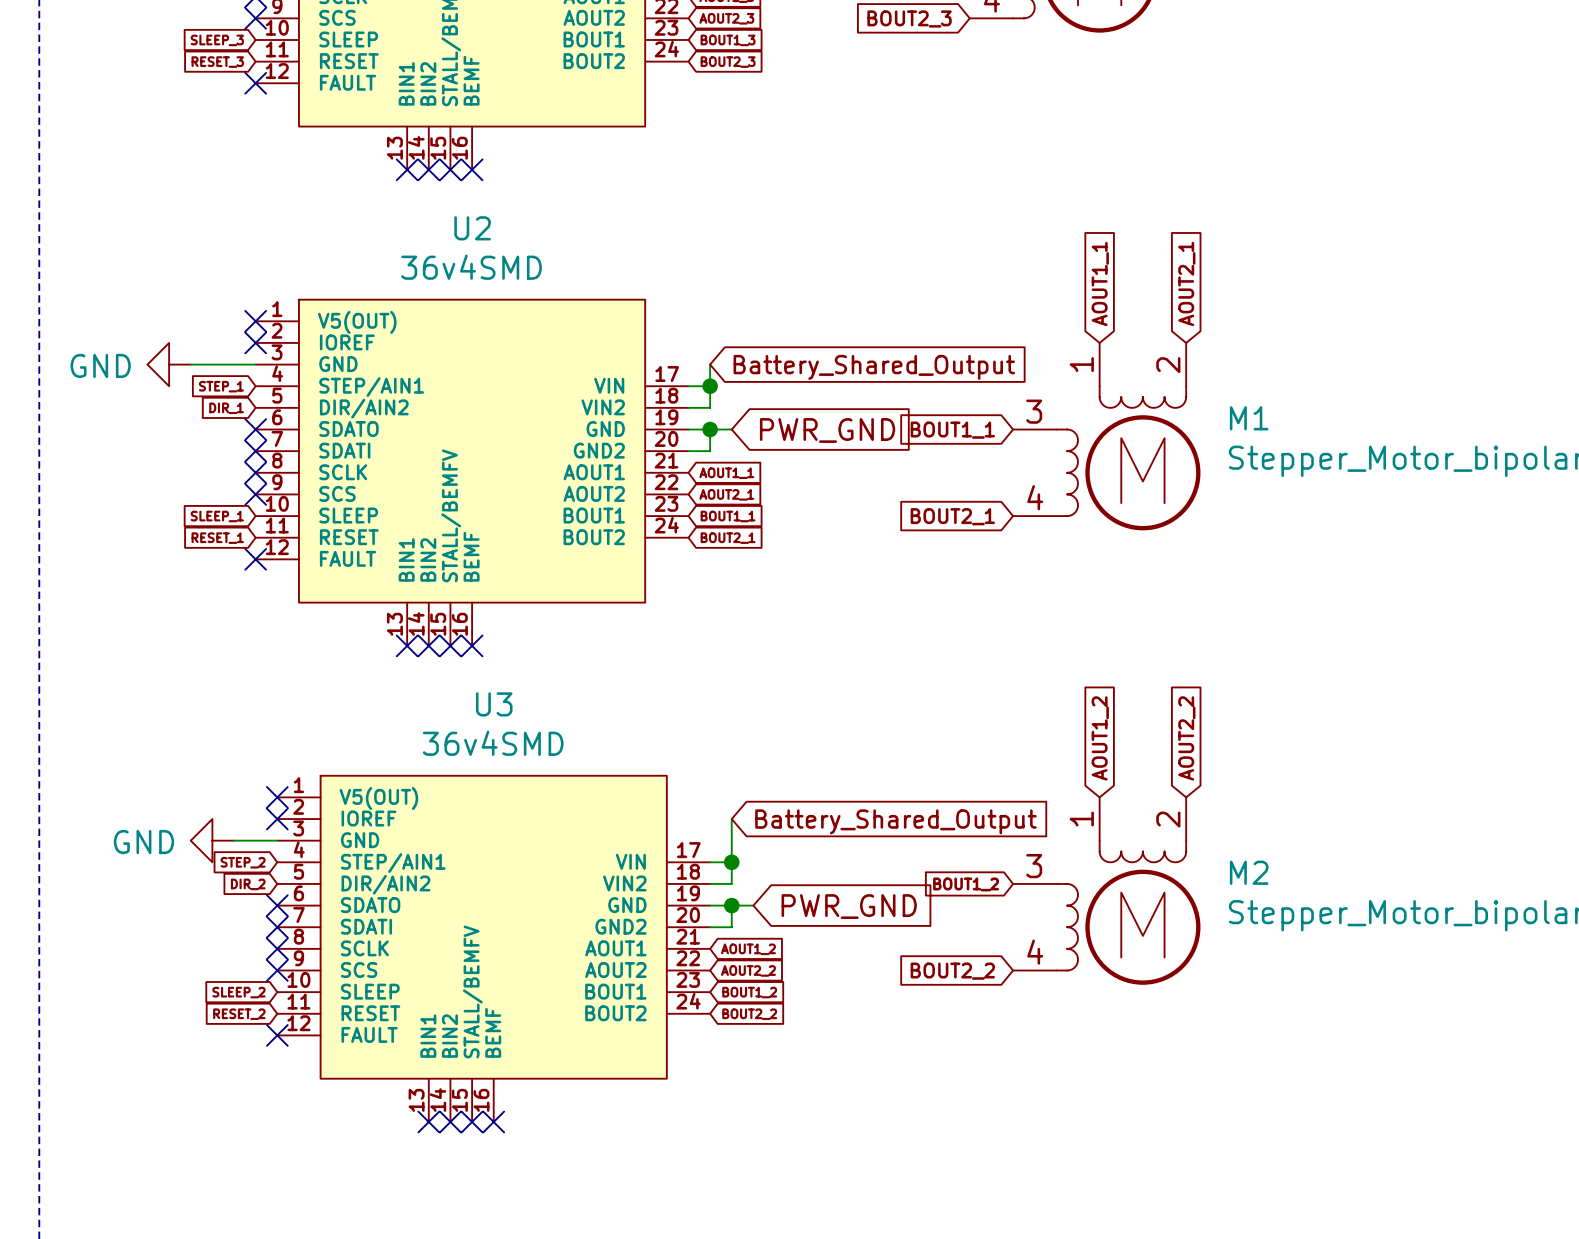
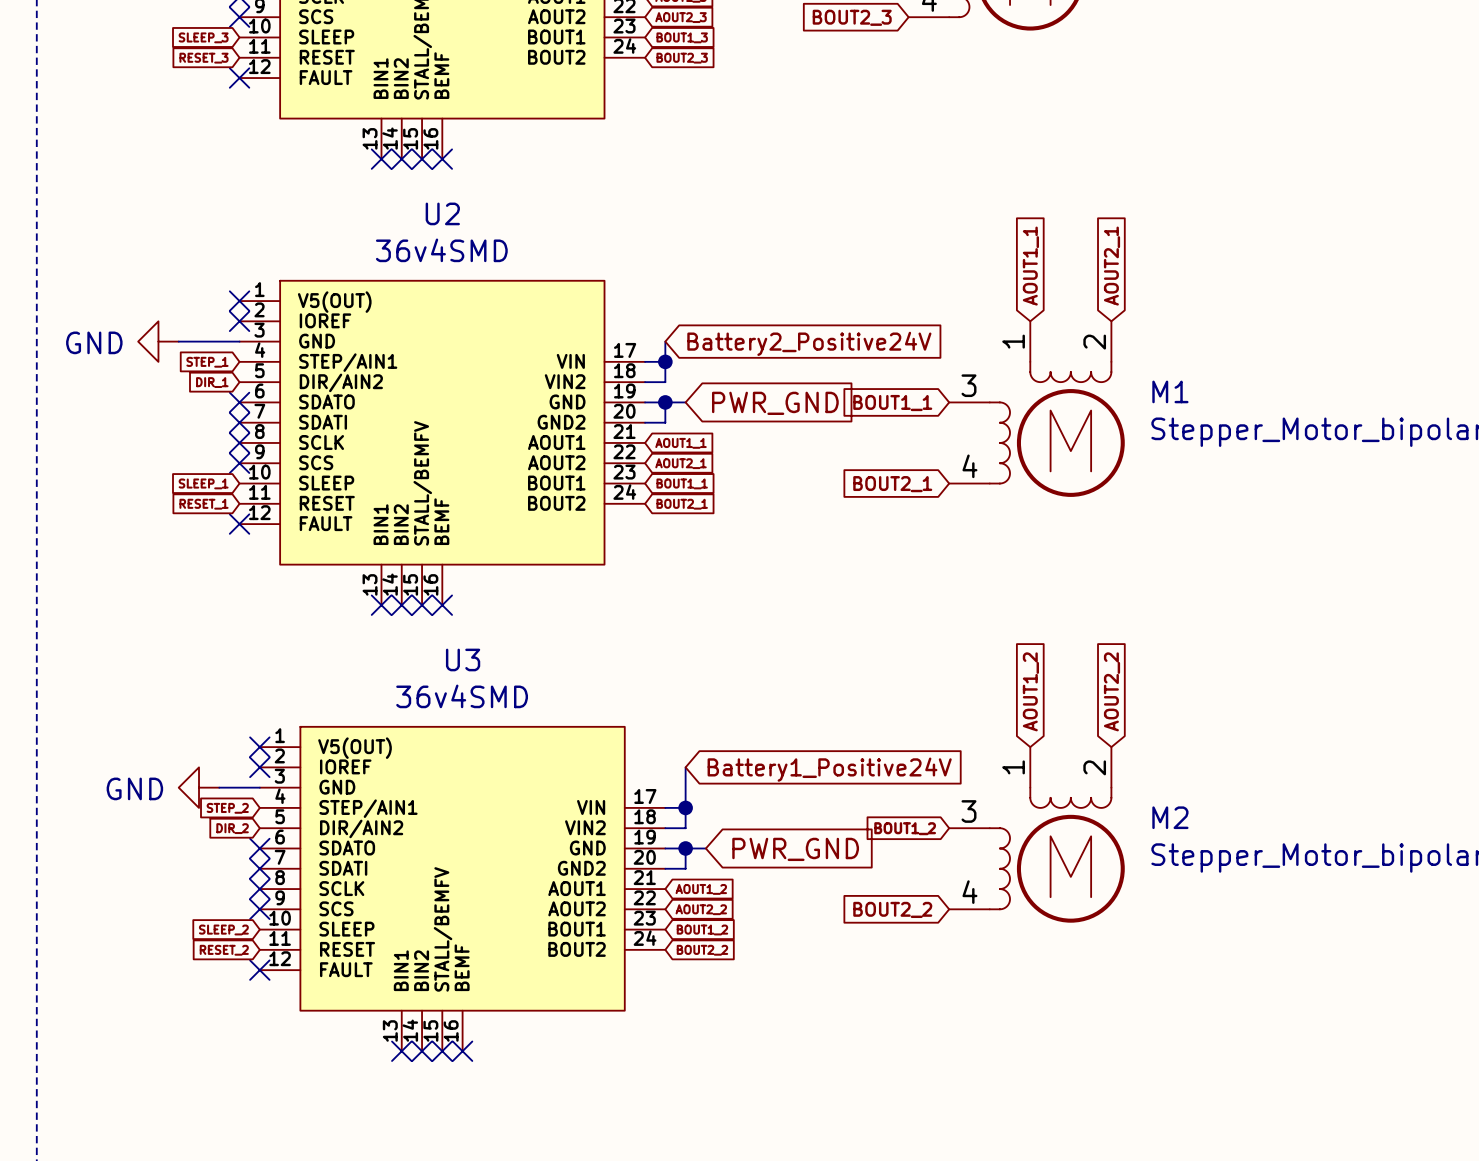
global label: Battery_Shared_Output (874, 367) -> Battery2_Positive24V (809, 343)
global label: Battery_Shared_Output (895, 821) -> Battery1_Positive24V (829, 769)

